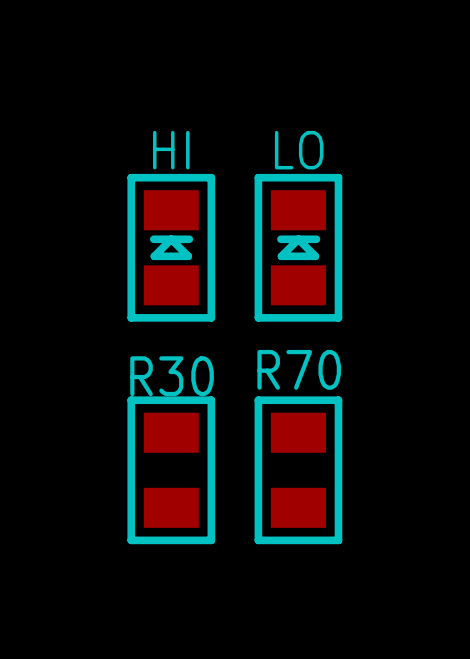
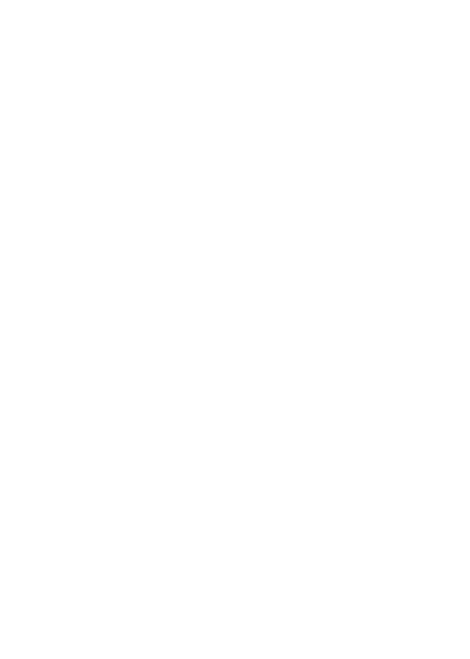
HI: (171, 247) -> none
LO: (298, 247) -> none
R30: (171, 470) -> none
R70: (298, 470) -> none

